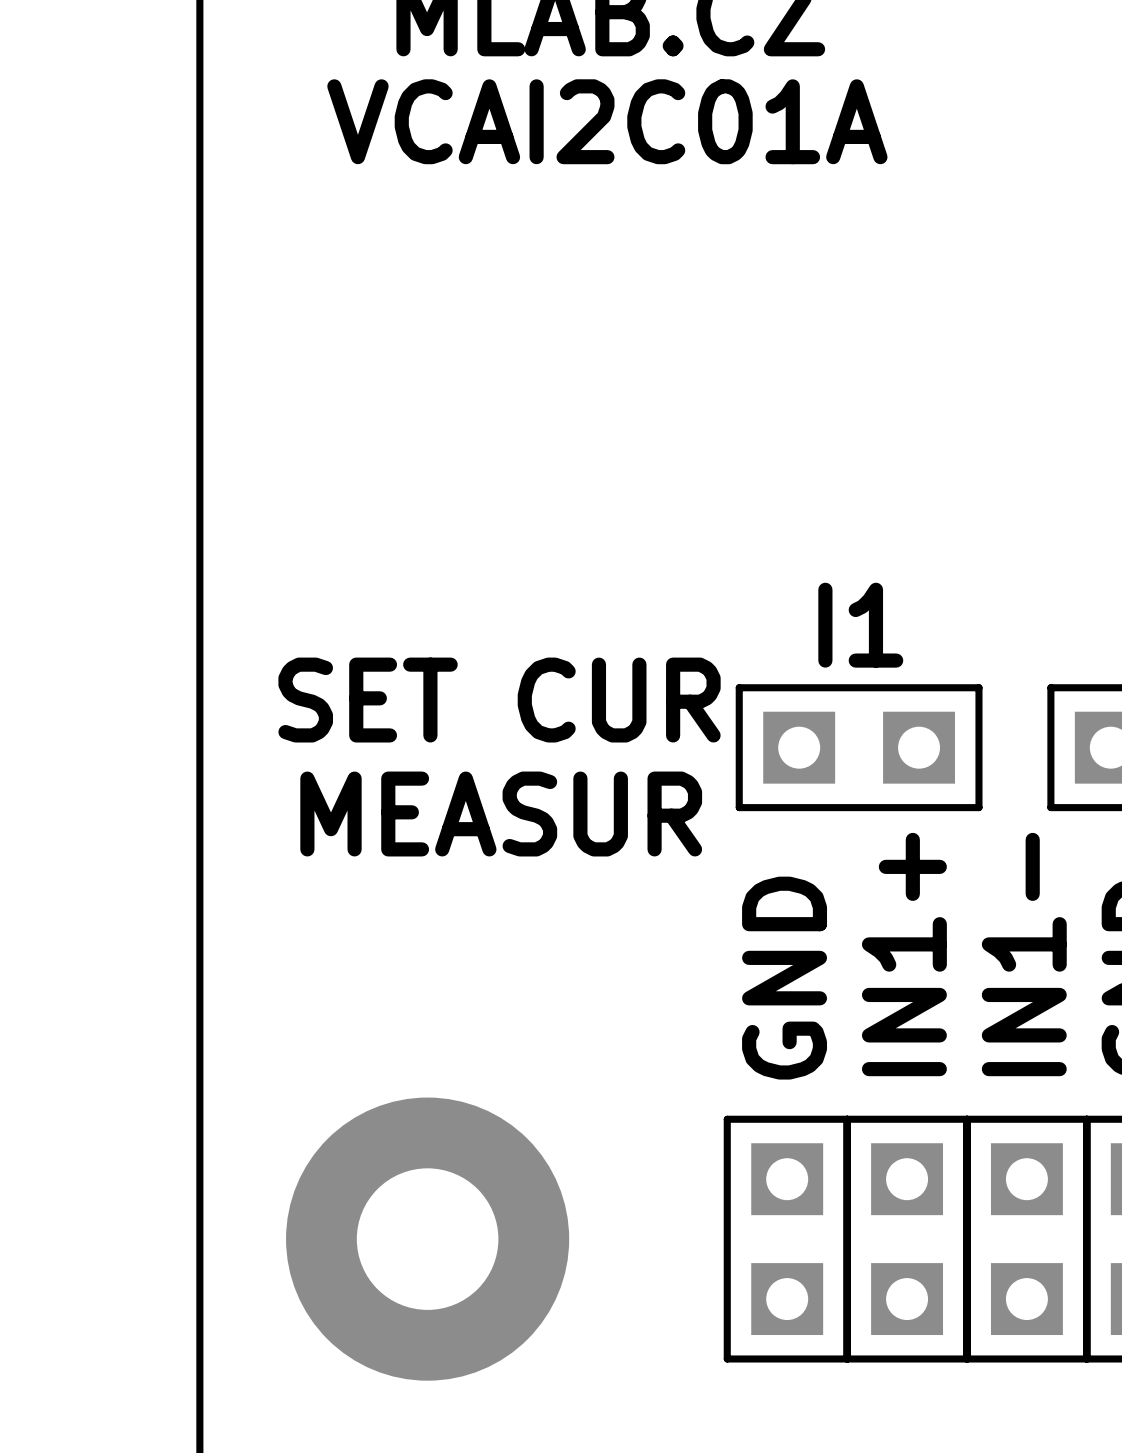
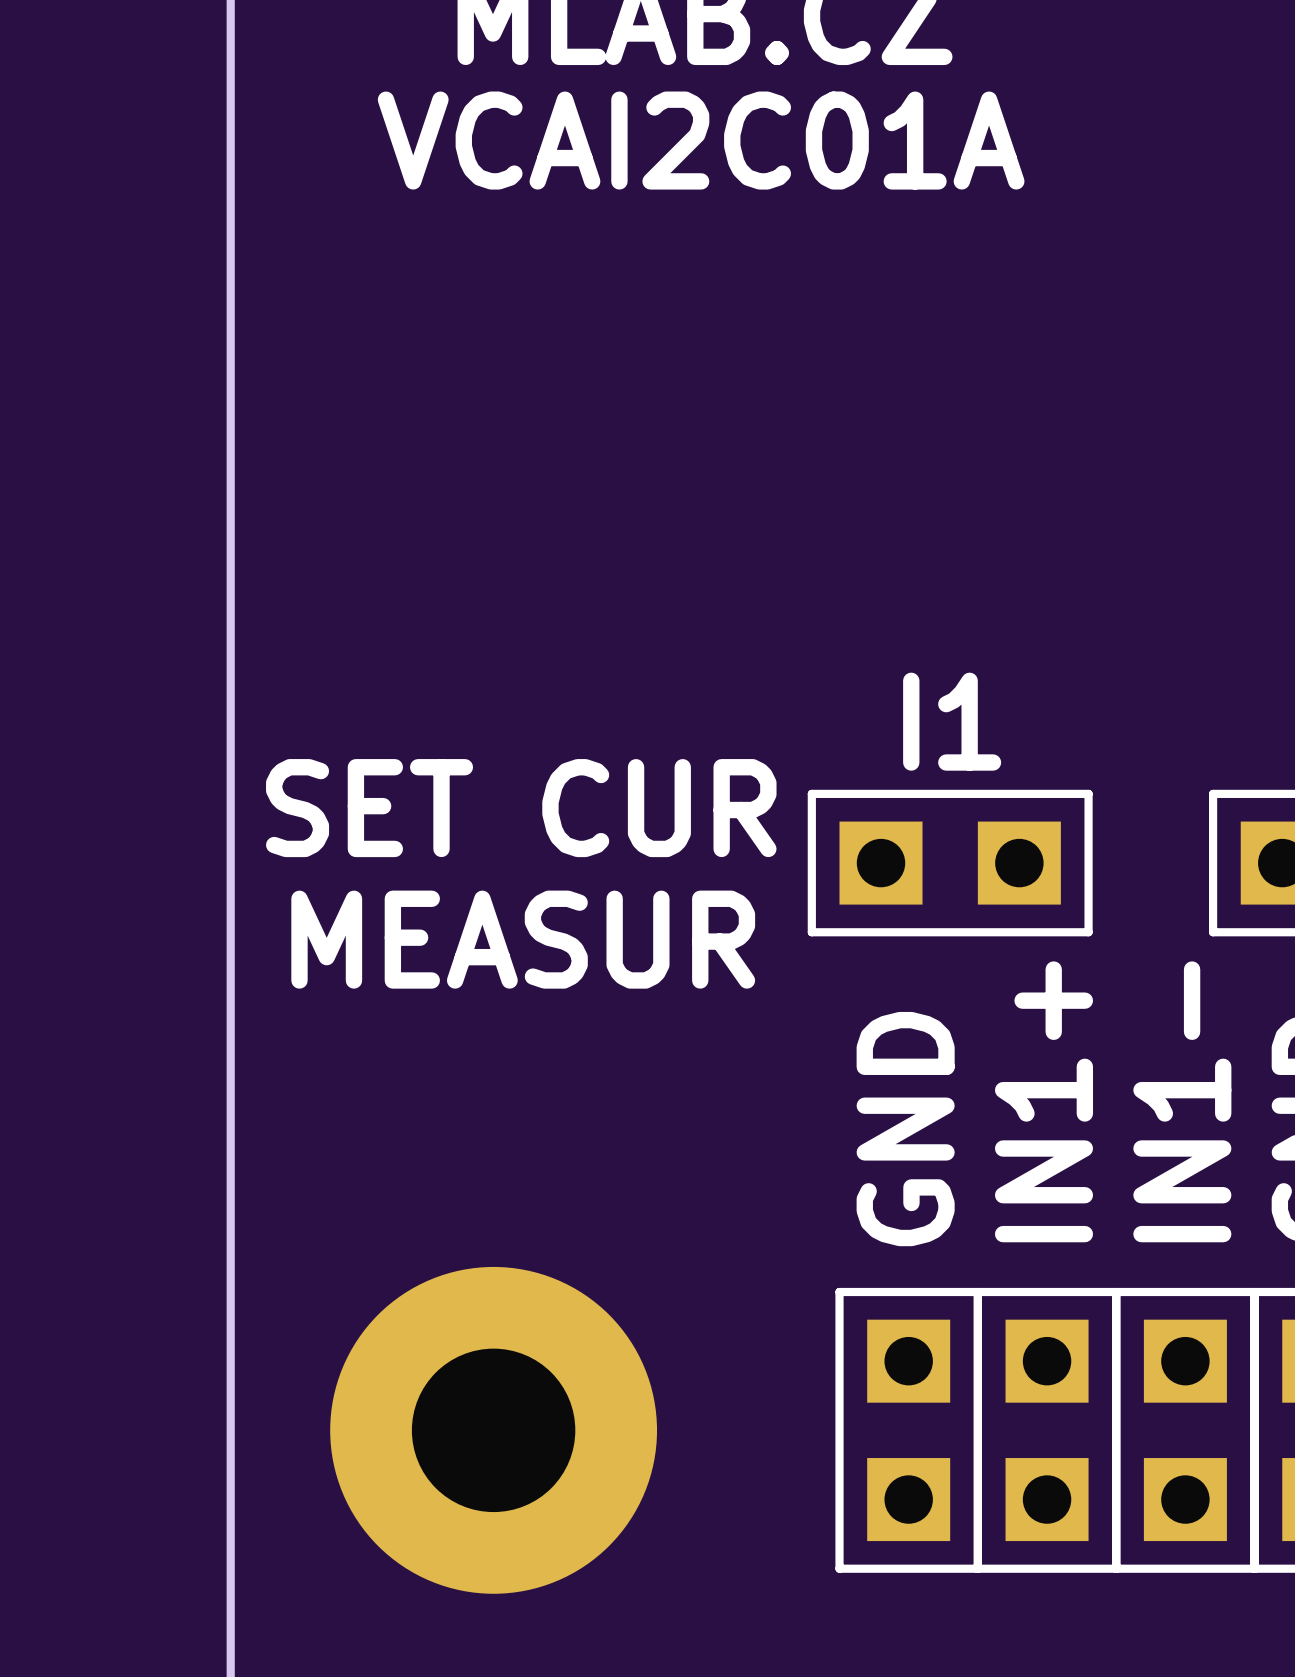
text position: I1 (860, 625) -> I1 (952, 721)
text position: SET CUR (499, 700) -> SET CUR (521, 808)
part position: (859, 747) -> (950, 863)
text position: MEASUR (501, 814) -> MEASUR (523, 939)

